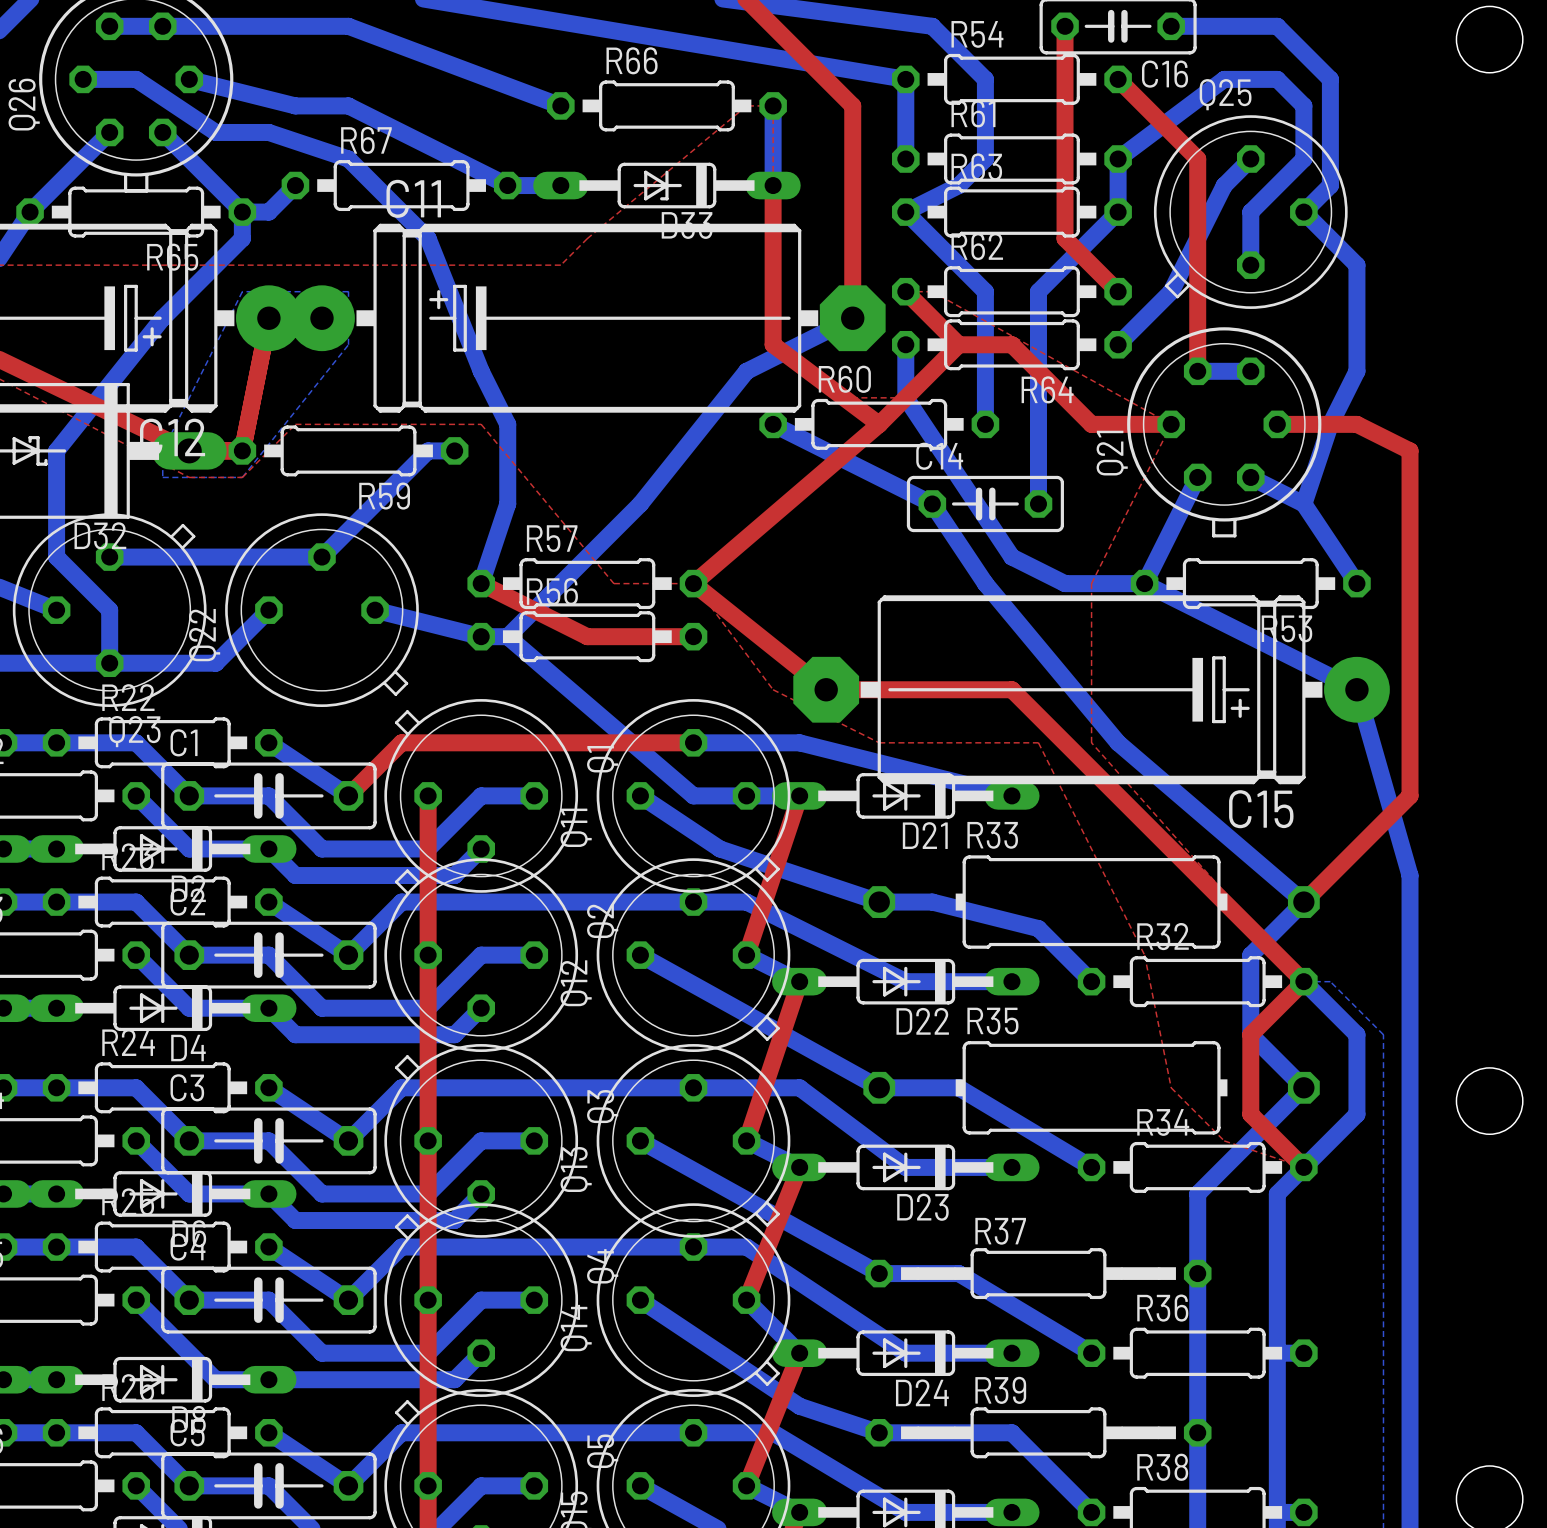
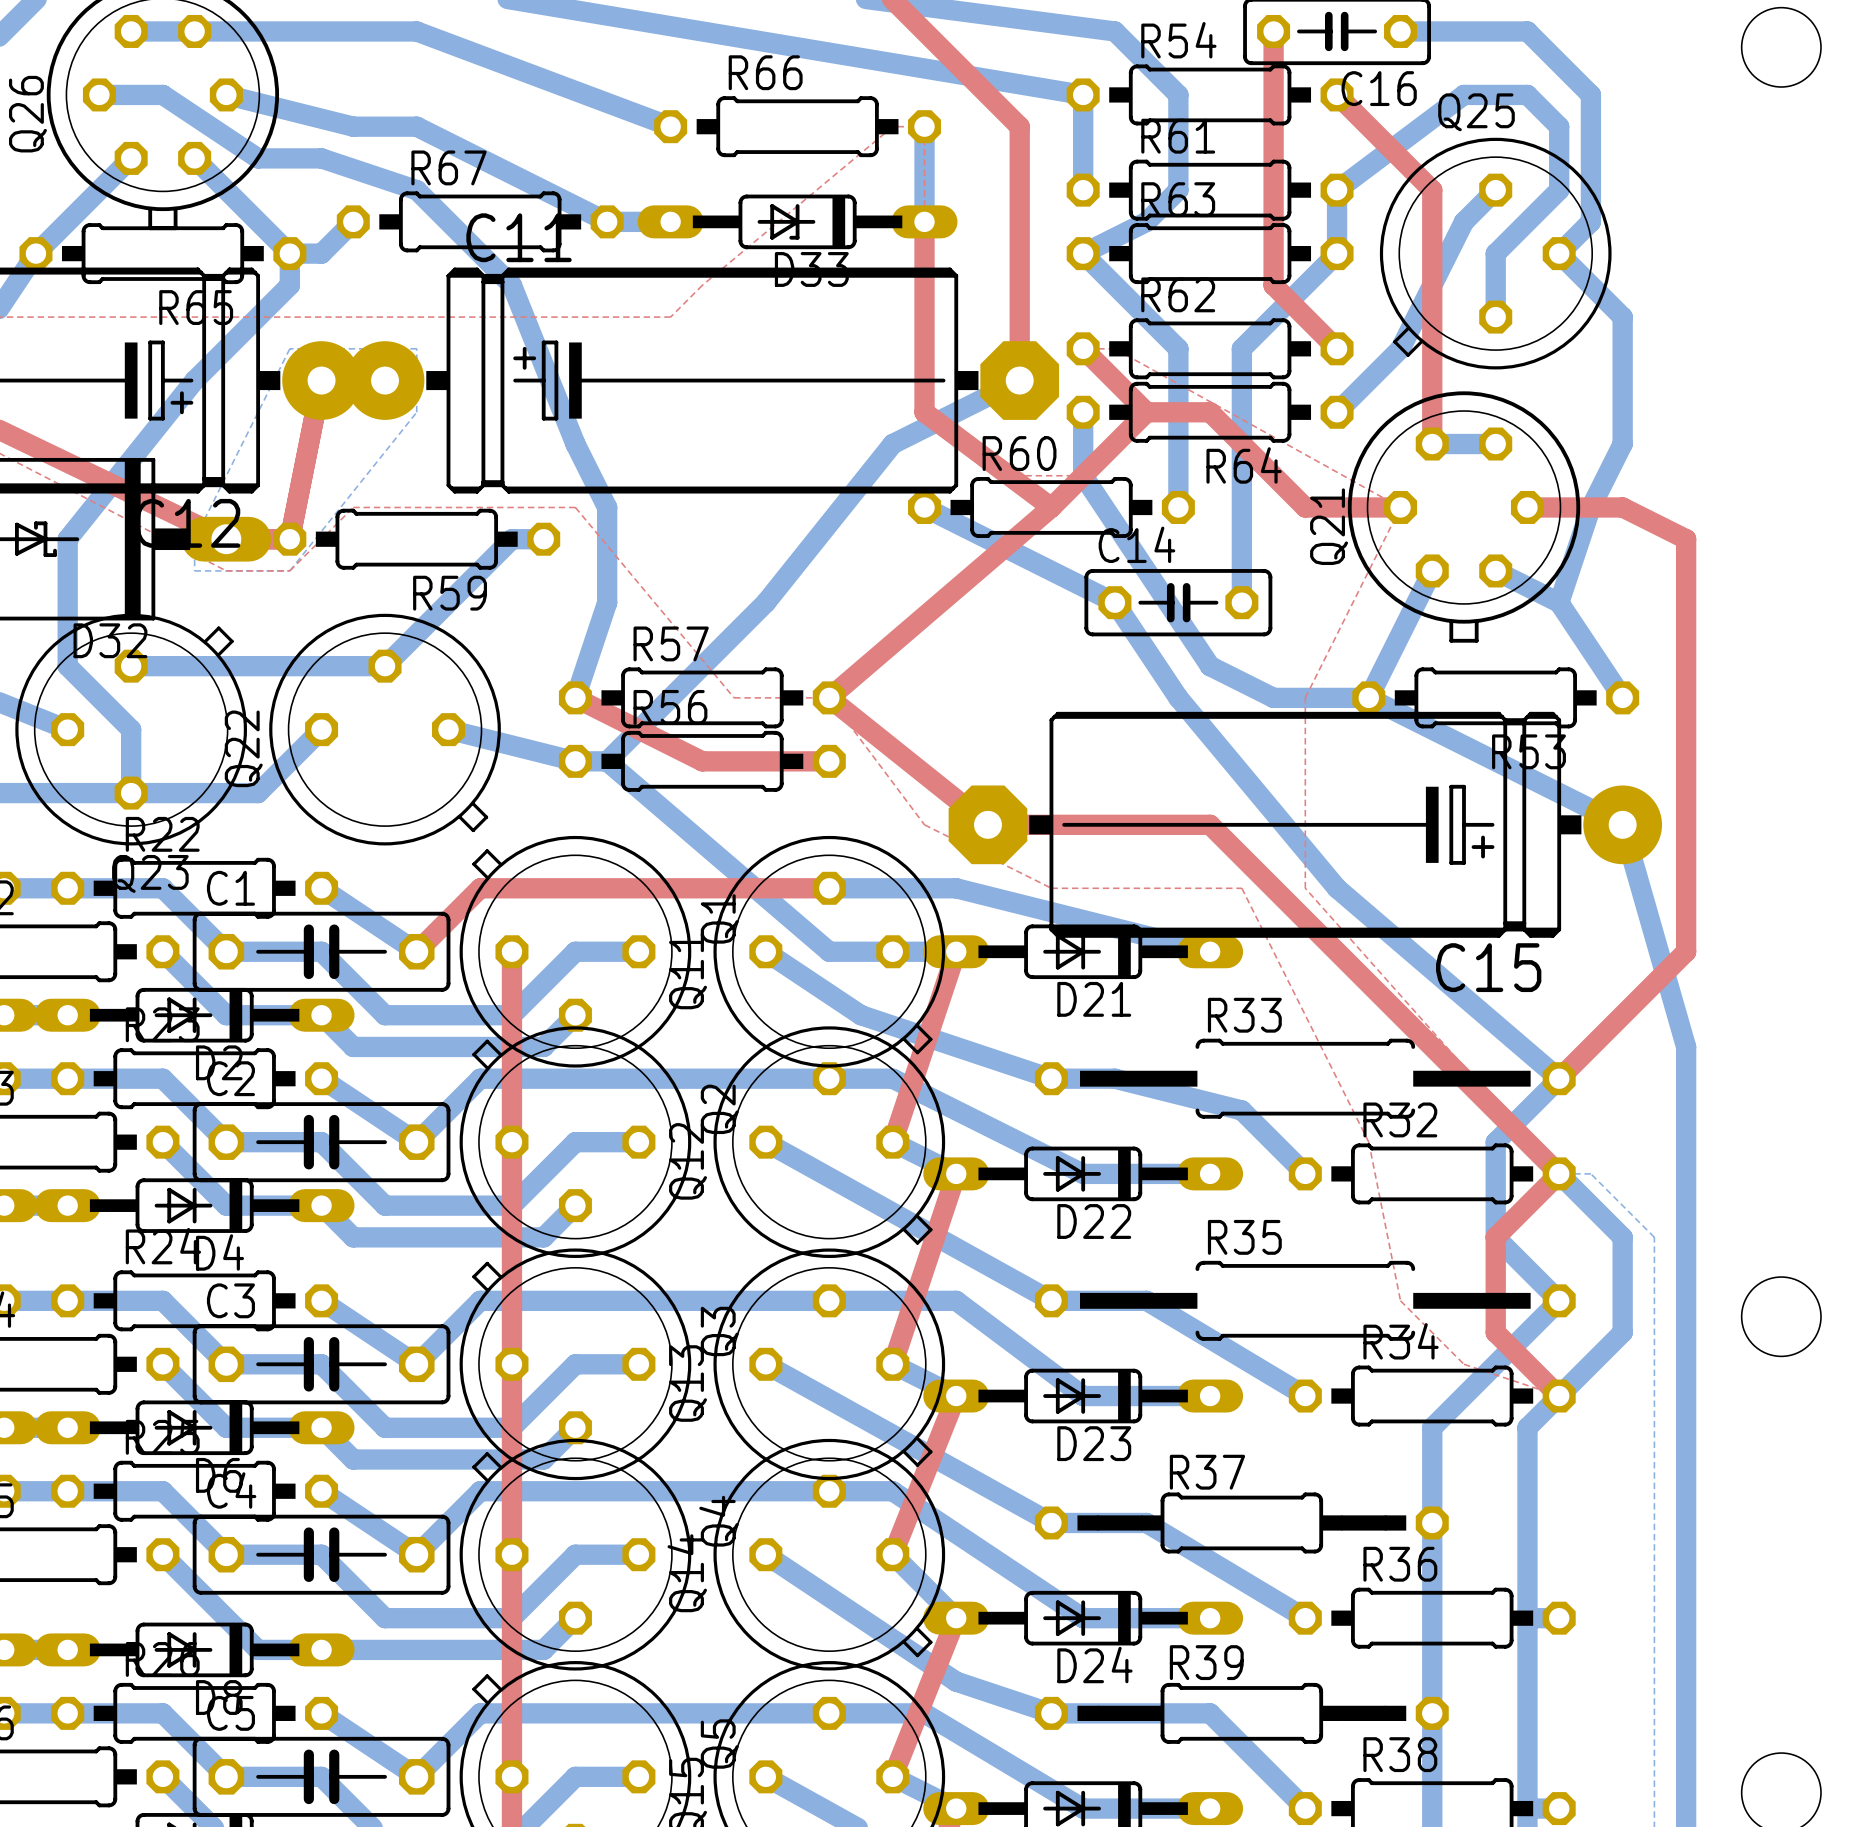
R33 name position: R33 (992, 835) -> R33 (1244, 1015)
R33 footprint: [863, 855, 1320, 949] -> [1034, 1038, 1576, 1119]
R35 name position: R35 (992, 1021) -> R35 (1244, 1237)
R35 footprint: [863, 1041, 1320, 1135] -> [1034, 1260, 1576, 1341]

